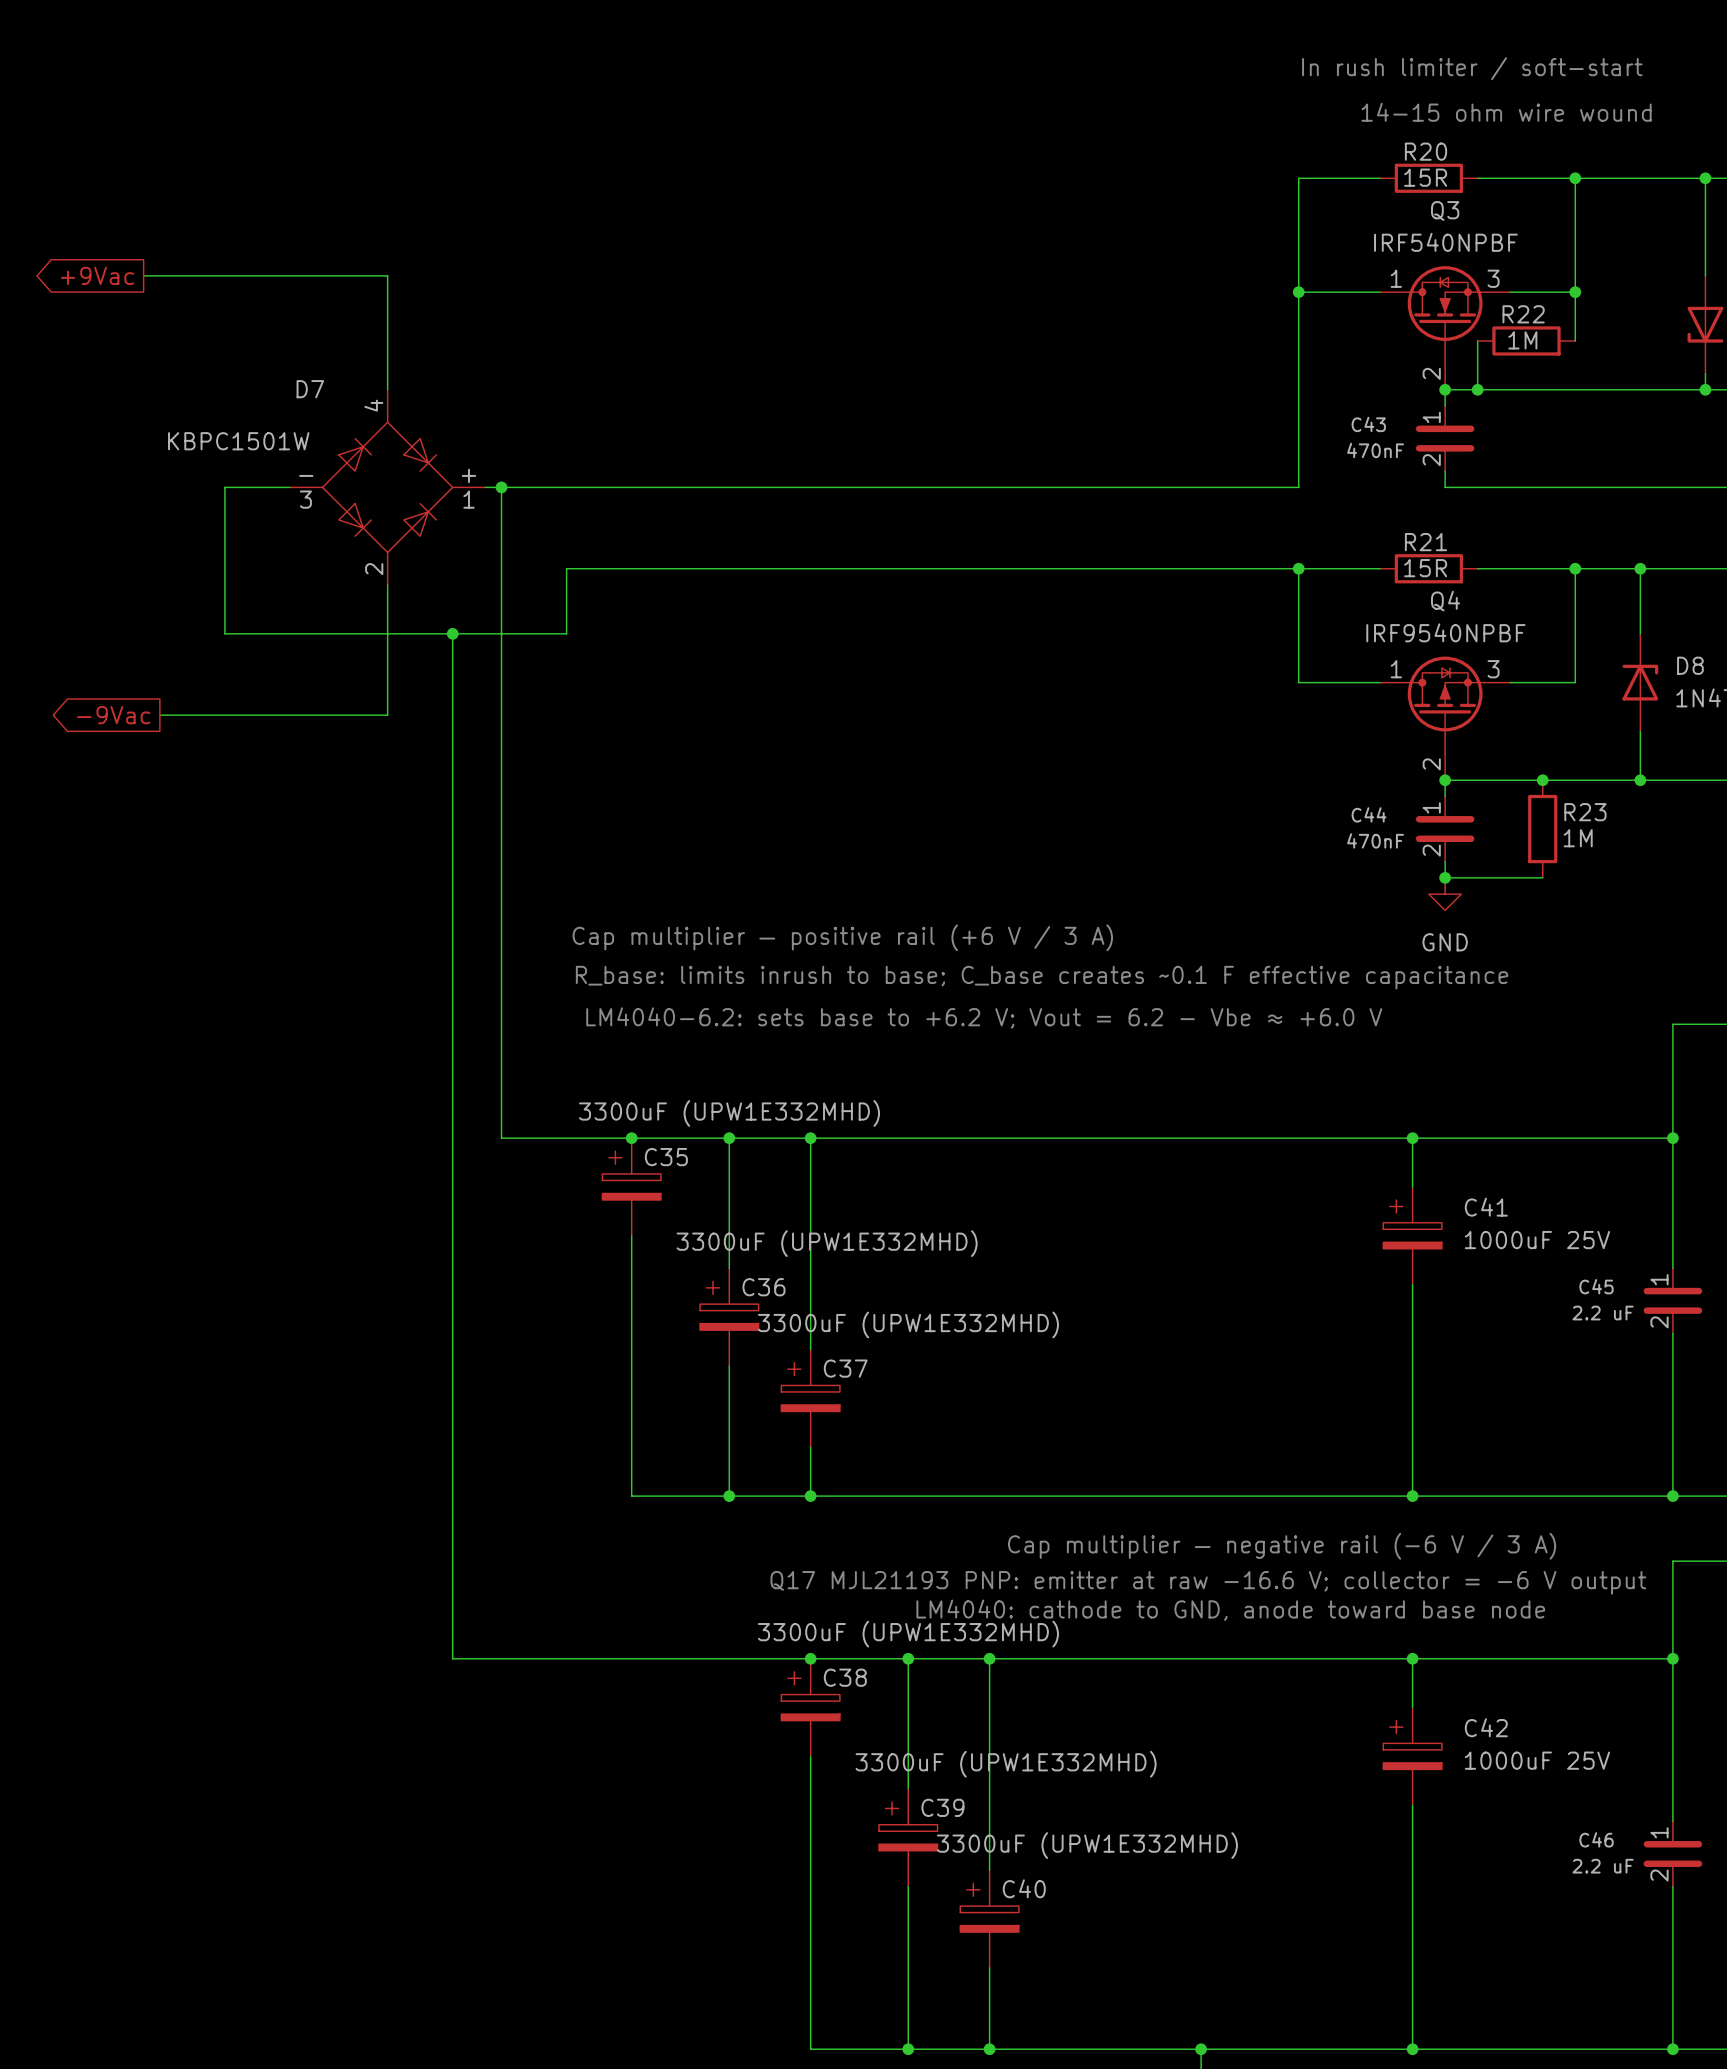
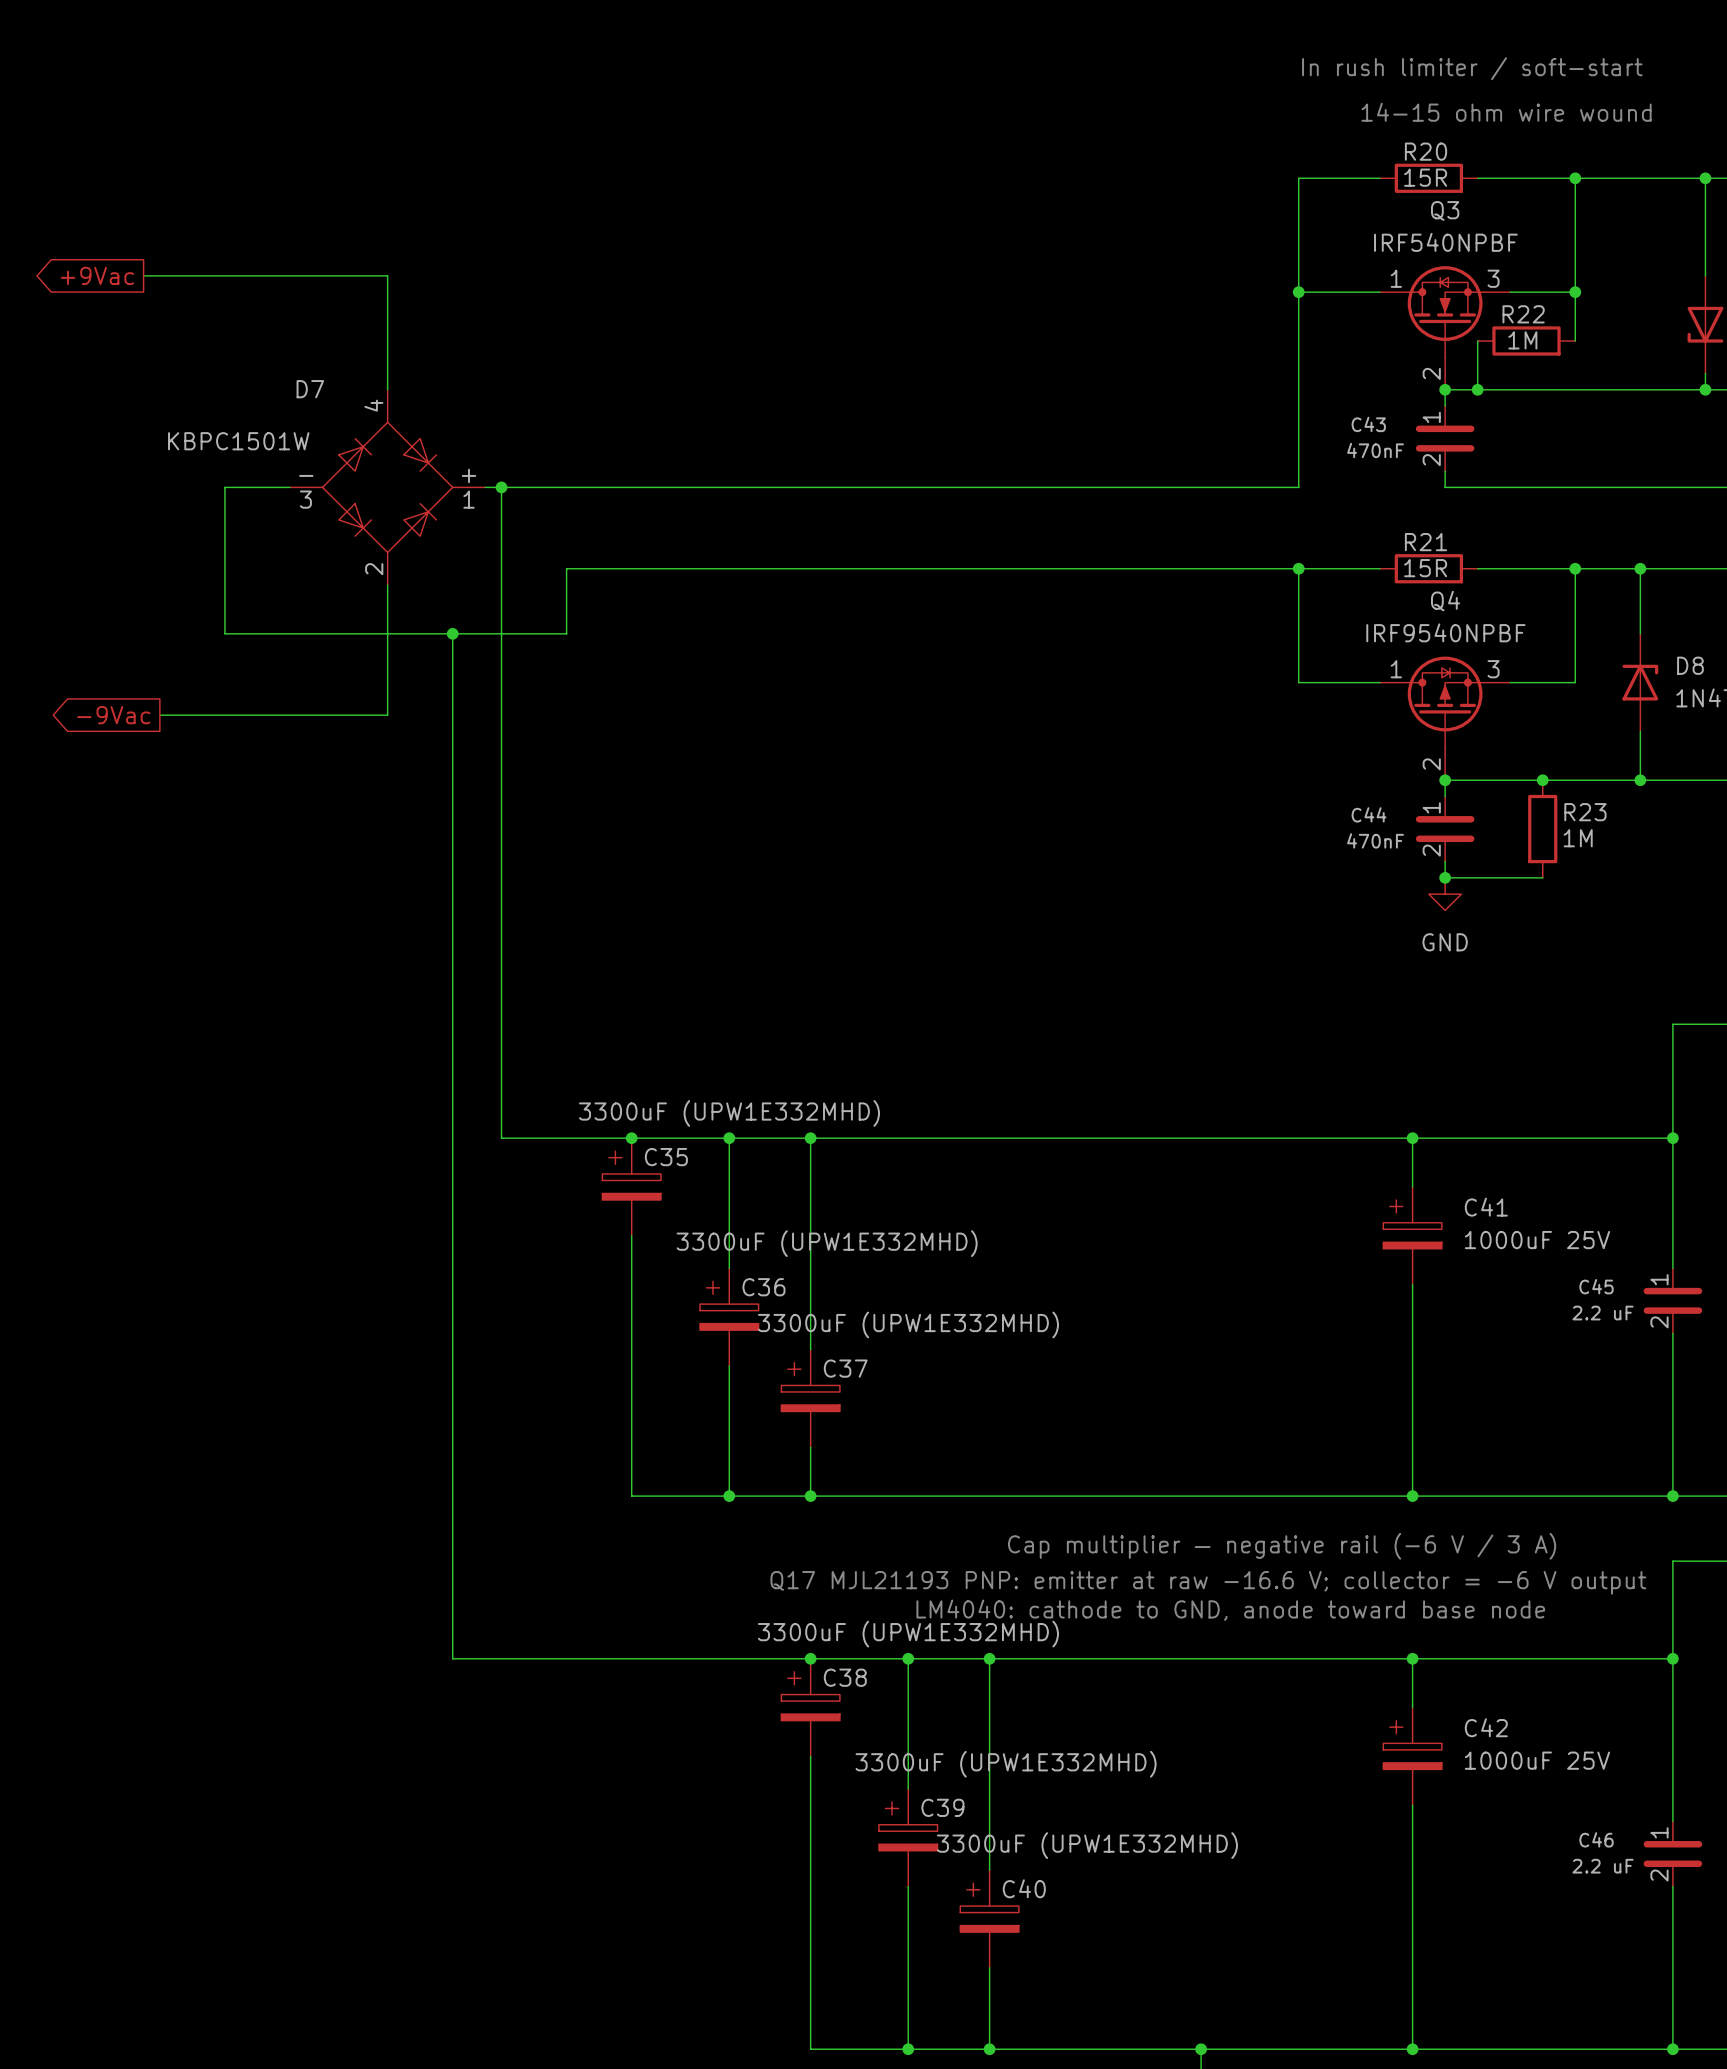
text: Cap multiplier — positive rail (+6 V / 3 A) (842, 937) -> none
text: R_base: limits inrush to base; C_base creates ~0.1 F effective capacitance (1042, 977) -> none
text: LM4040-6.2: sets base to +6.2 V; Vout = 6.2 - Vbe ≈ +6.0 V (984, 1017) -> none

